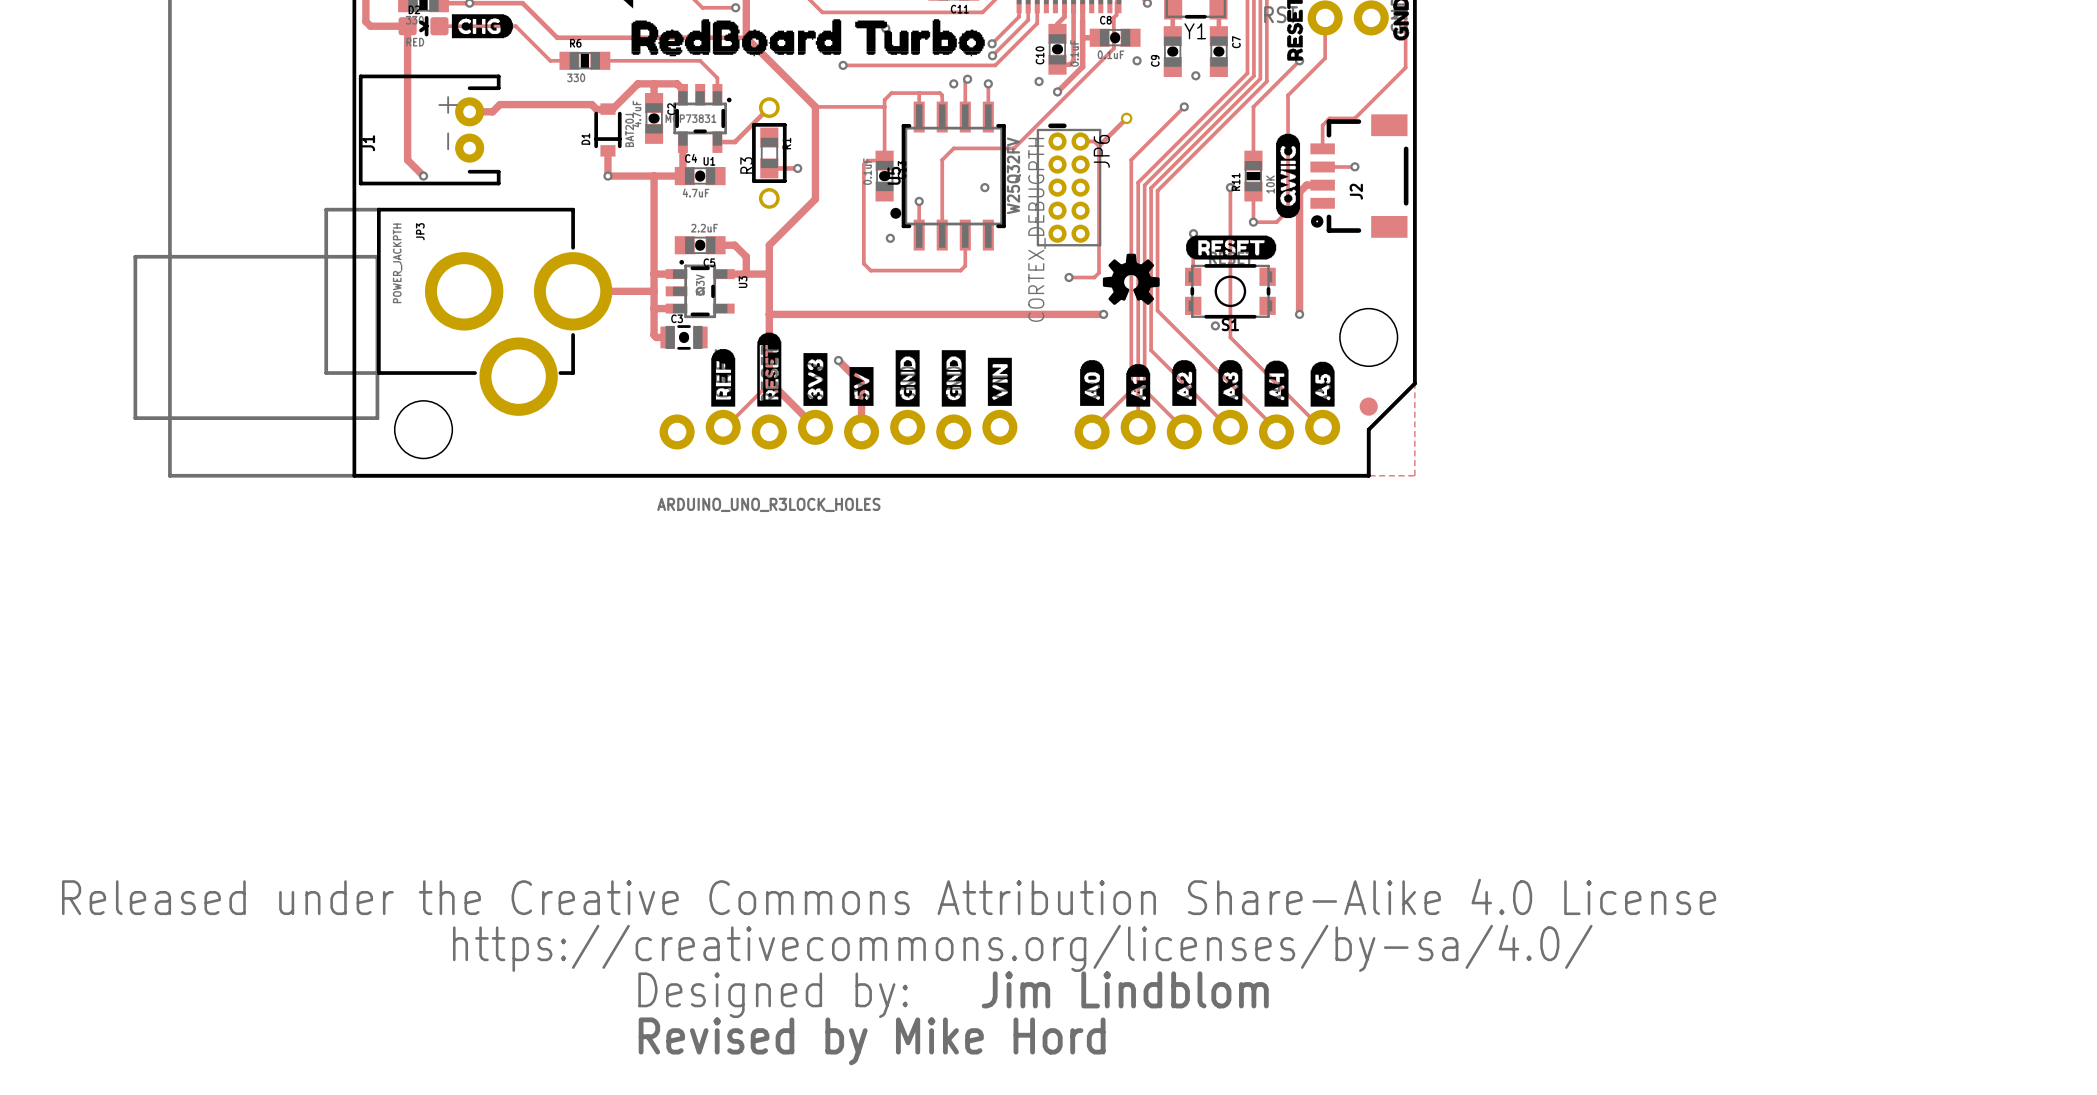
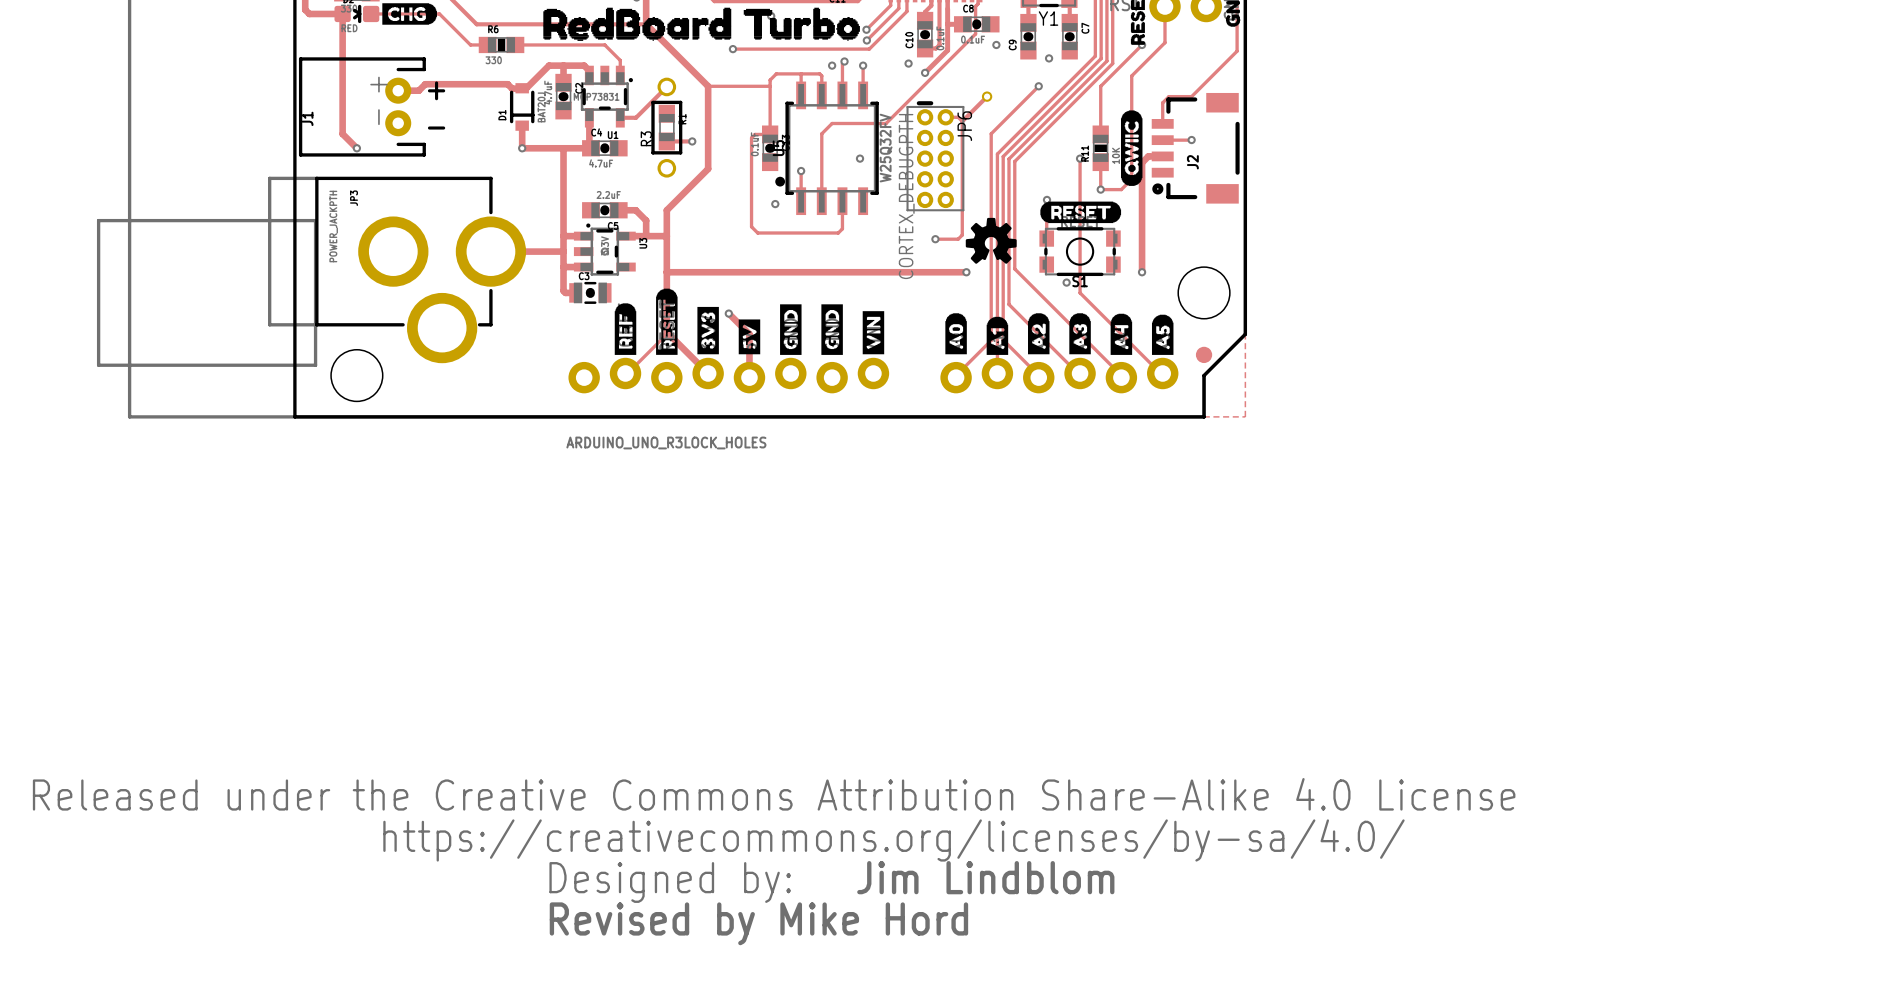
text: none -> + (436, 90)
text: none -> - (436, 128)

